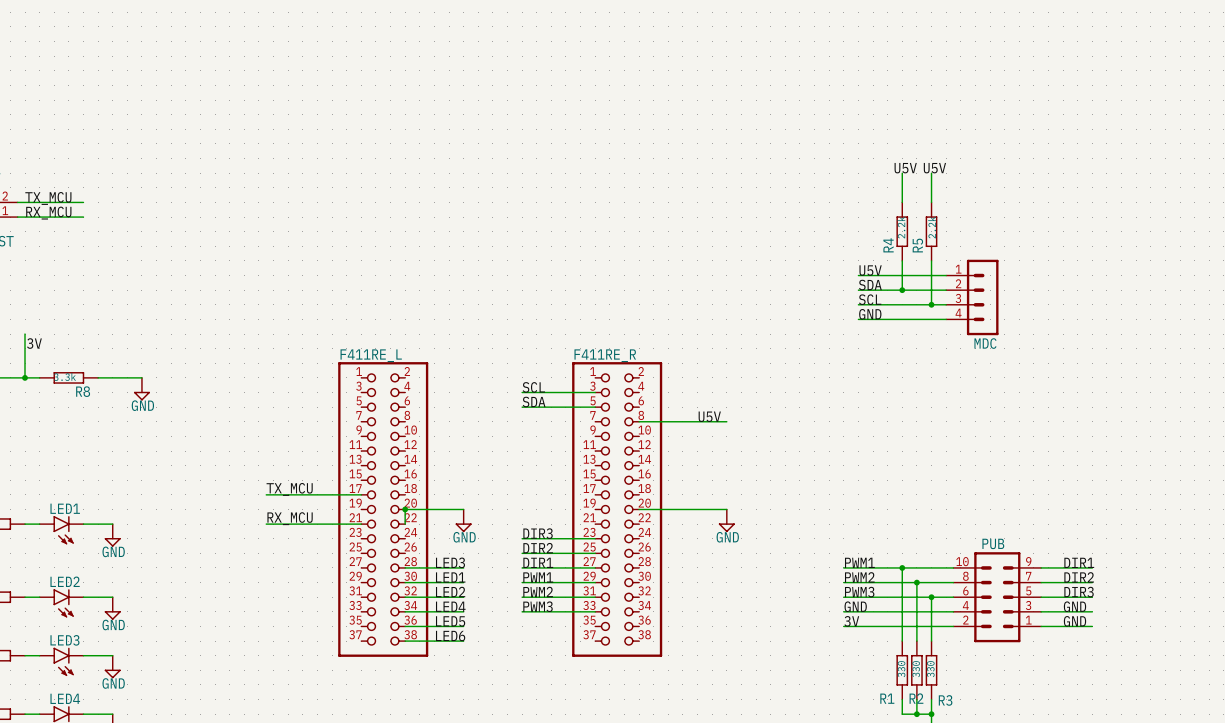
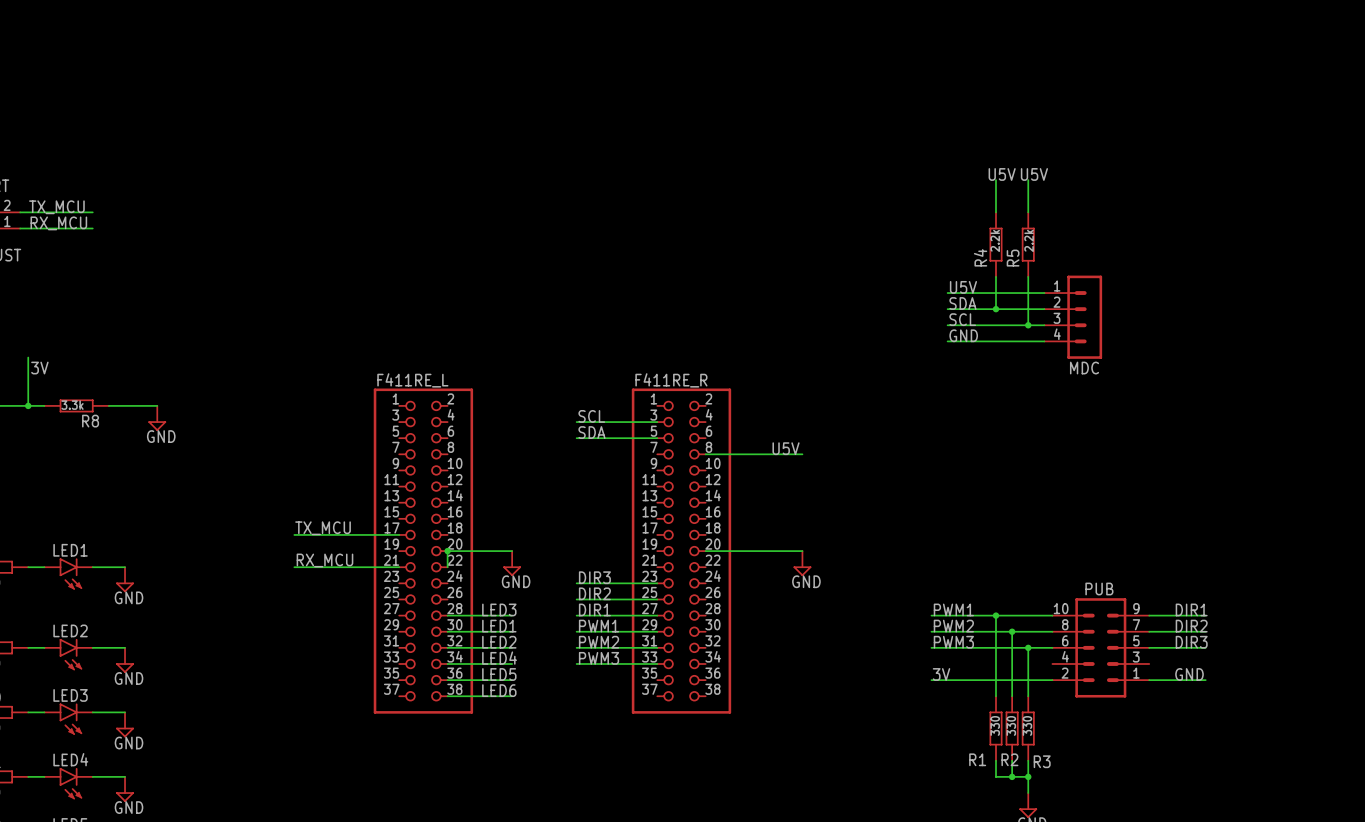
label: GND (855, 606) -> none
label: GND (1074, 606) -> none
wire: (843, 611) (953, 611) -> none
wire: (1041, 611) (1092, 611) -> none

